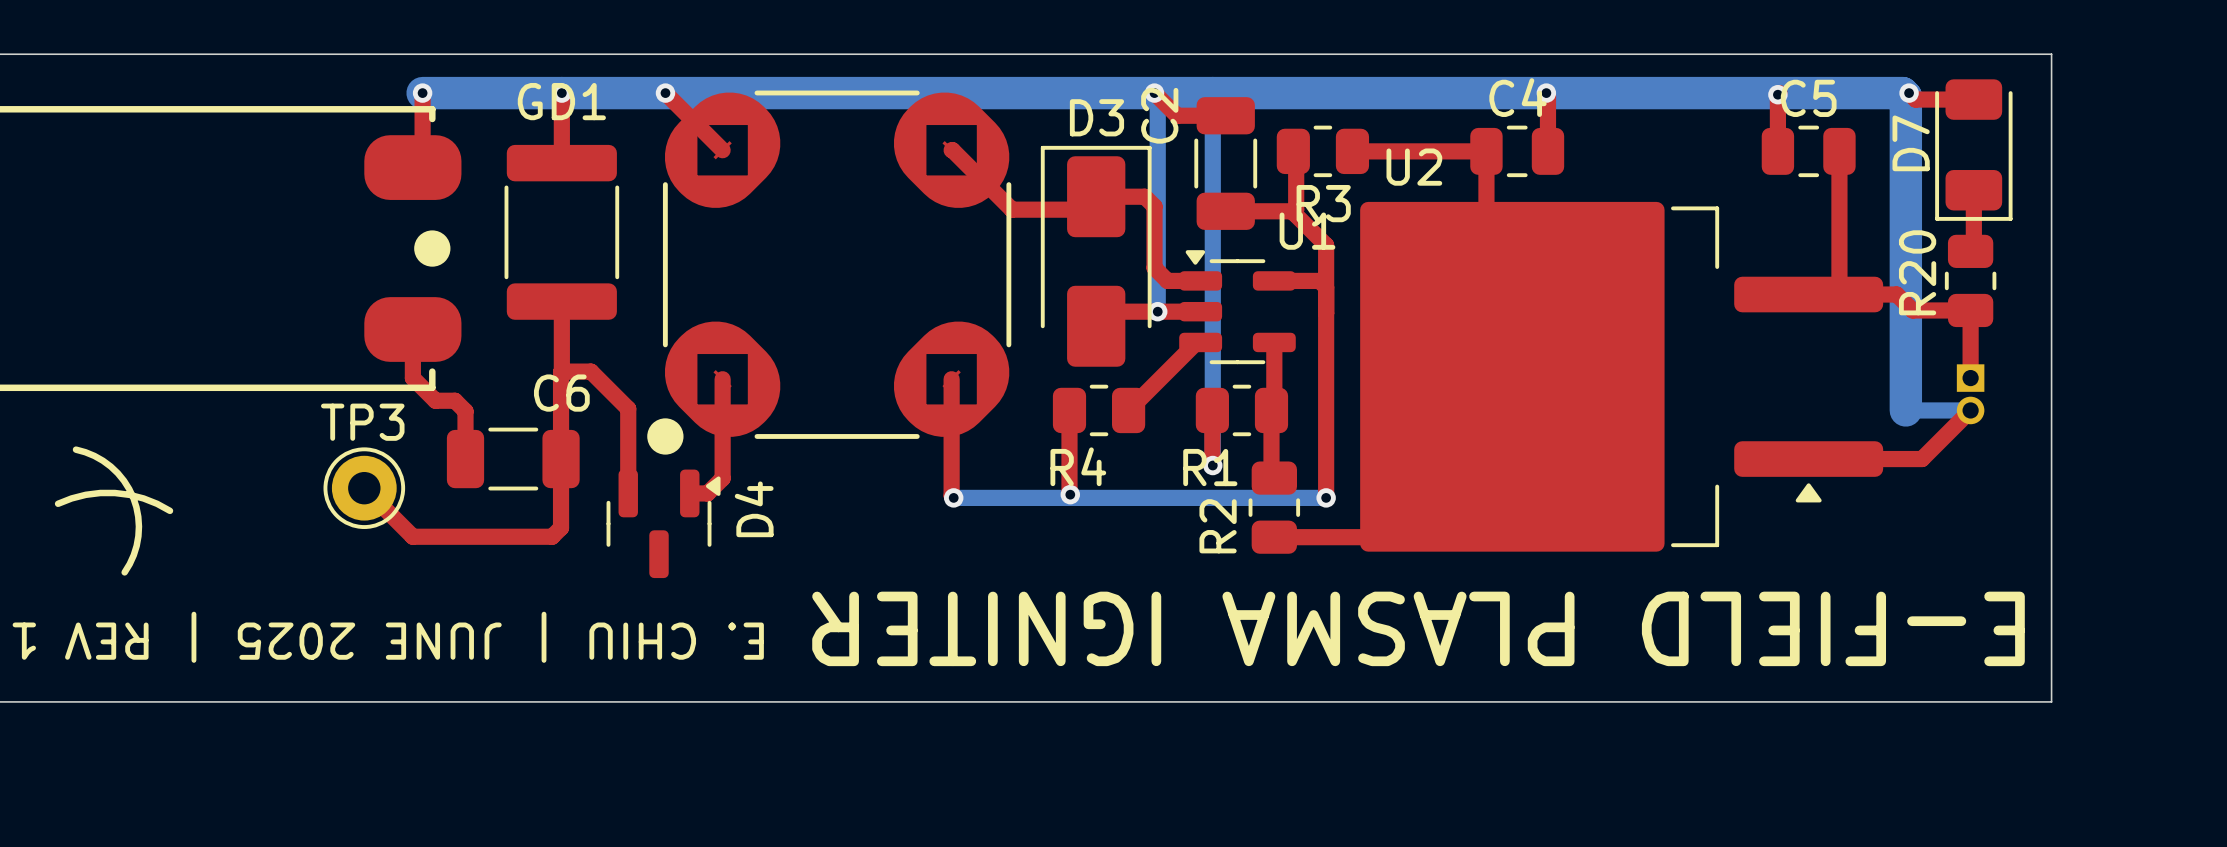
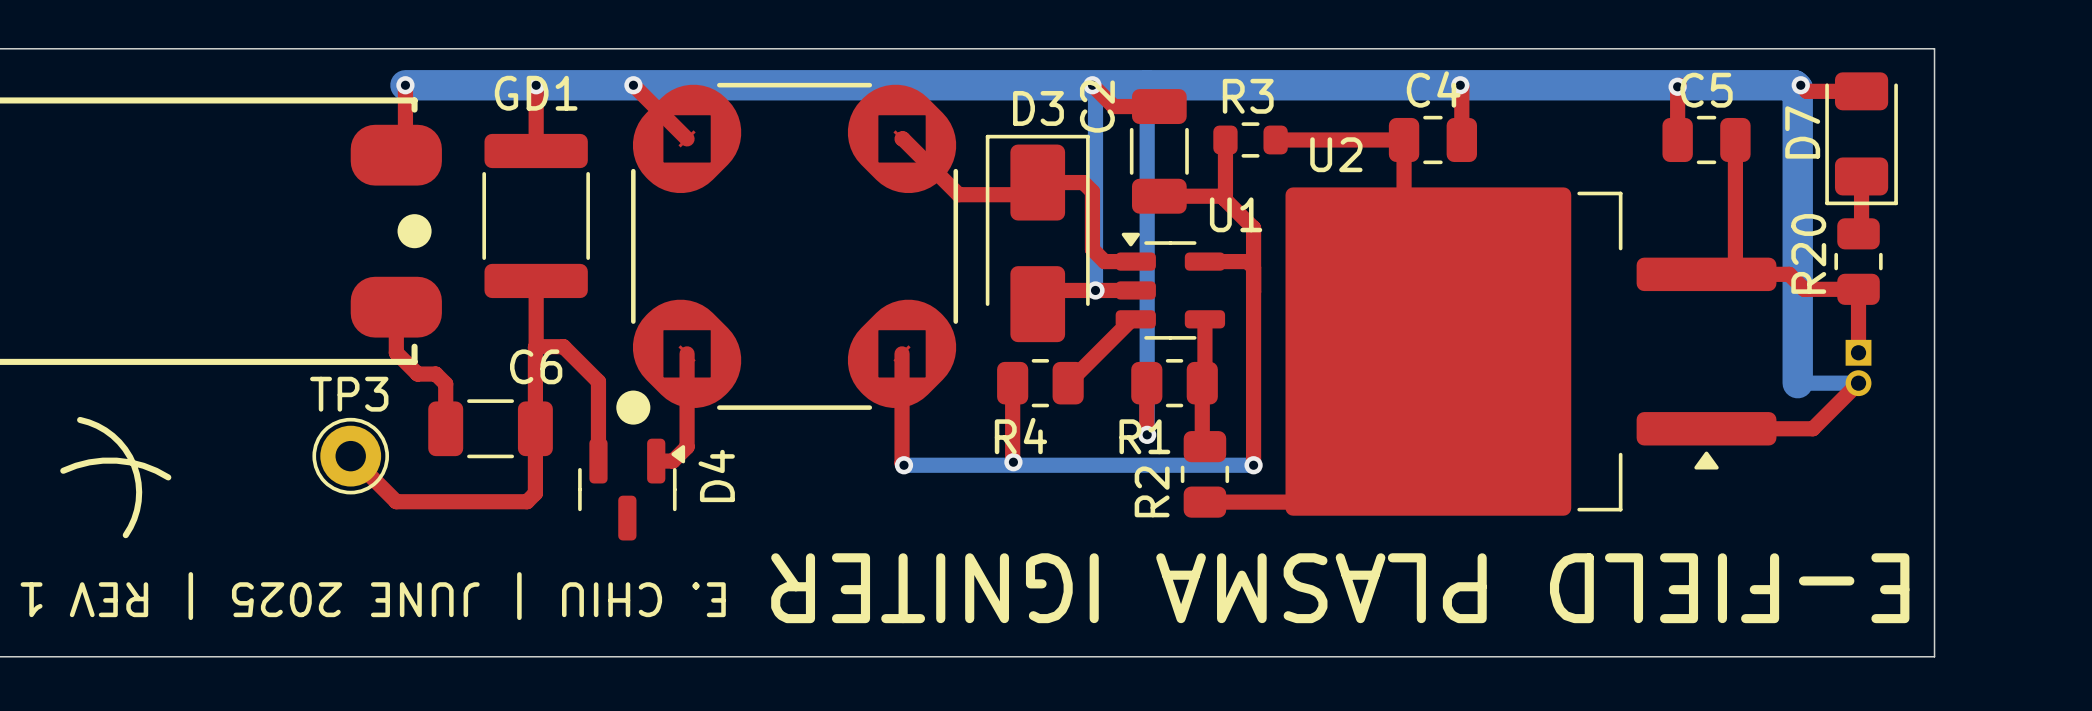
R3 footprint: [1276, 125, 1370, 178] -> [1213, 122, 1288, 158]
R3 name position: R3 (1323, 203) -> R3 (1248, 96)

